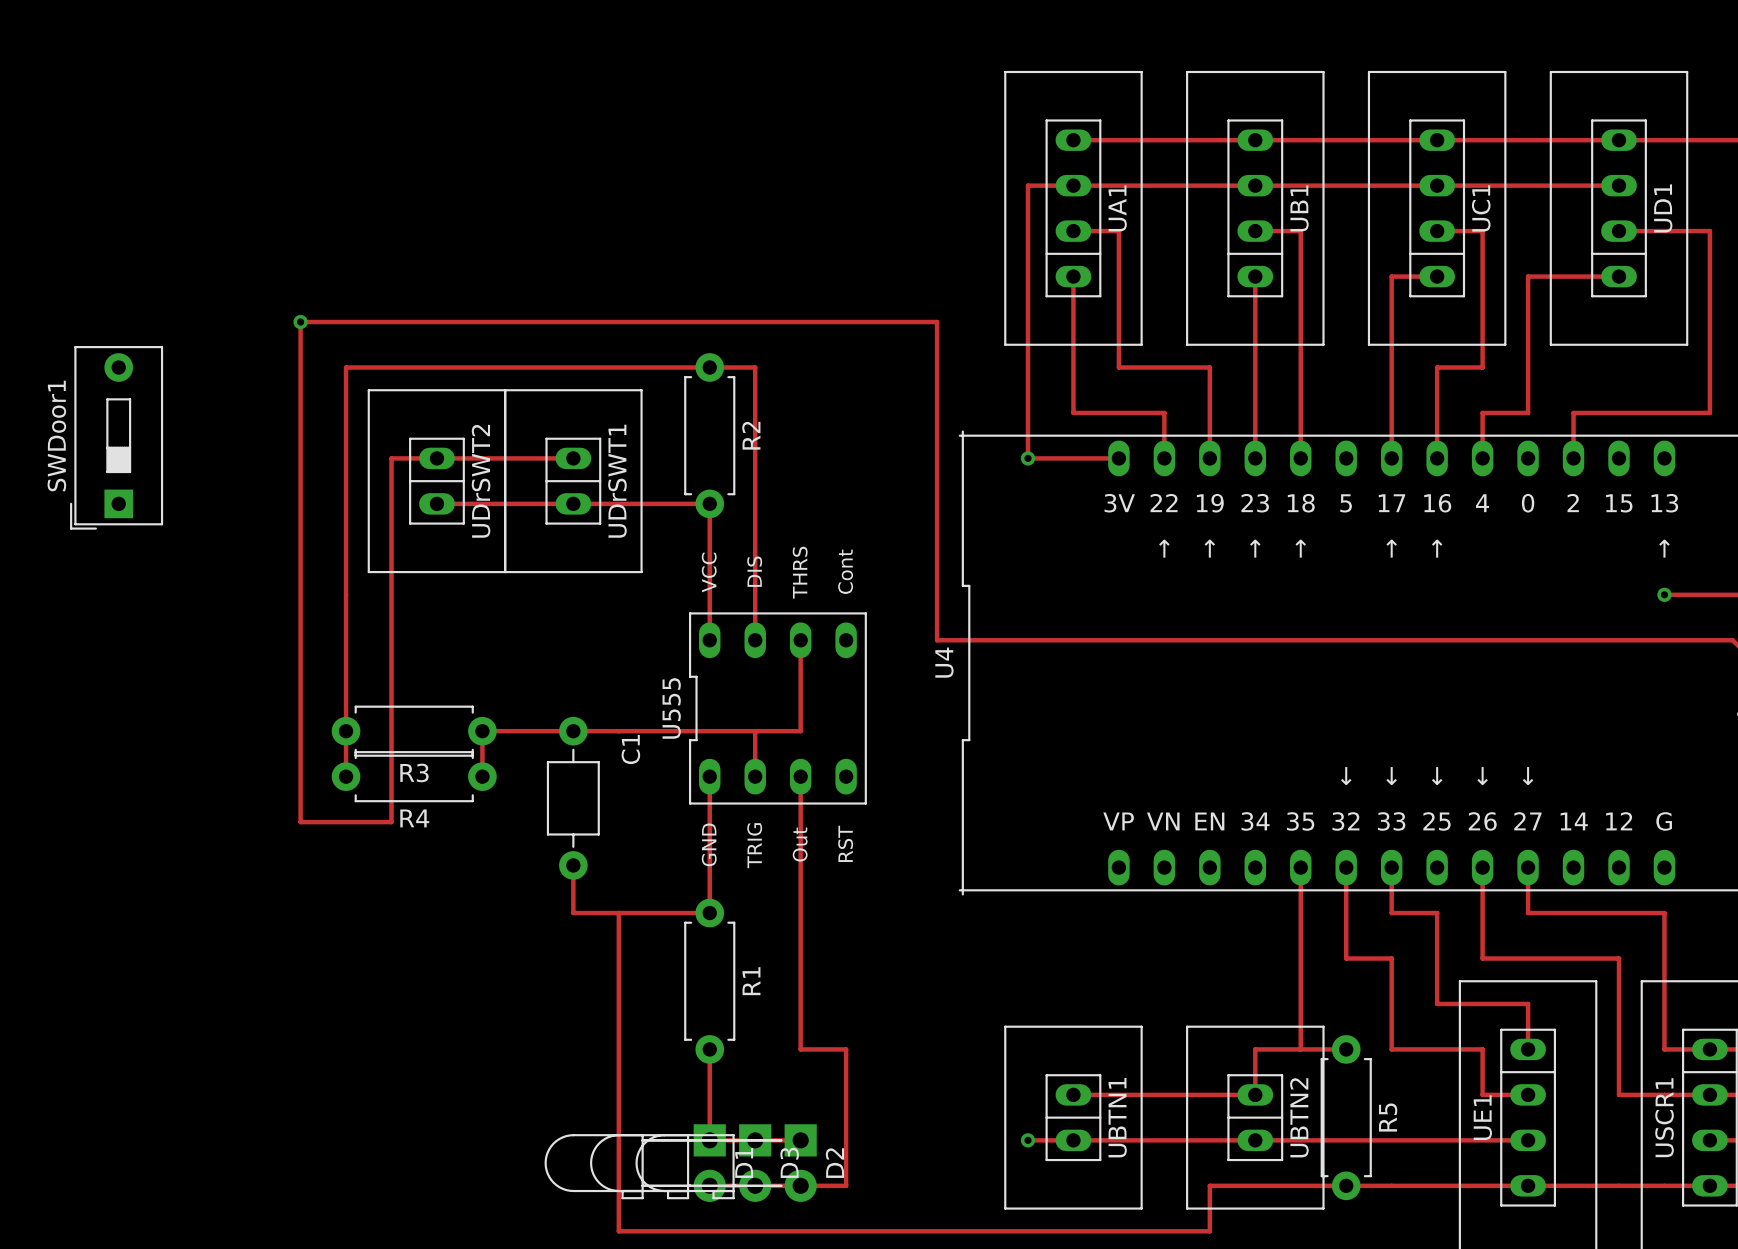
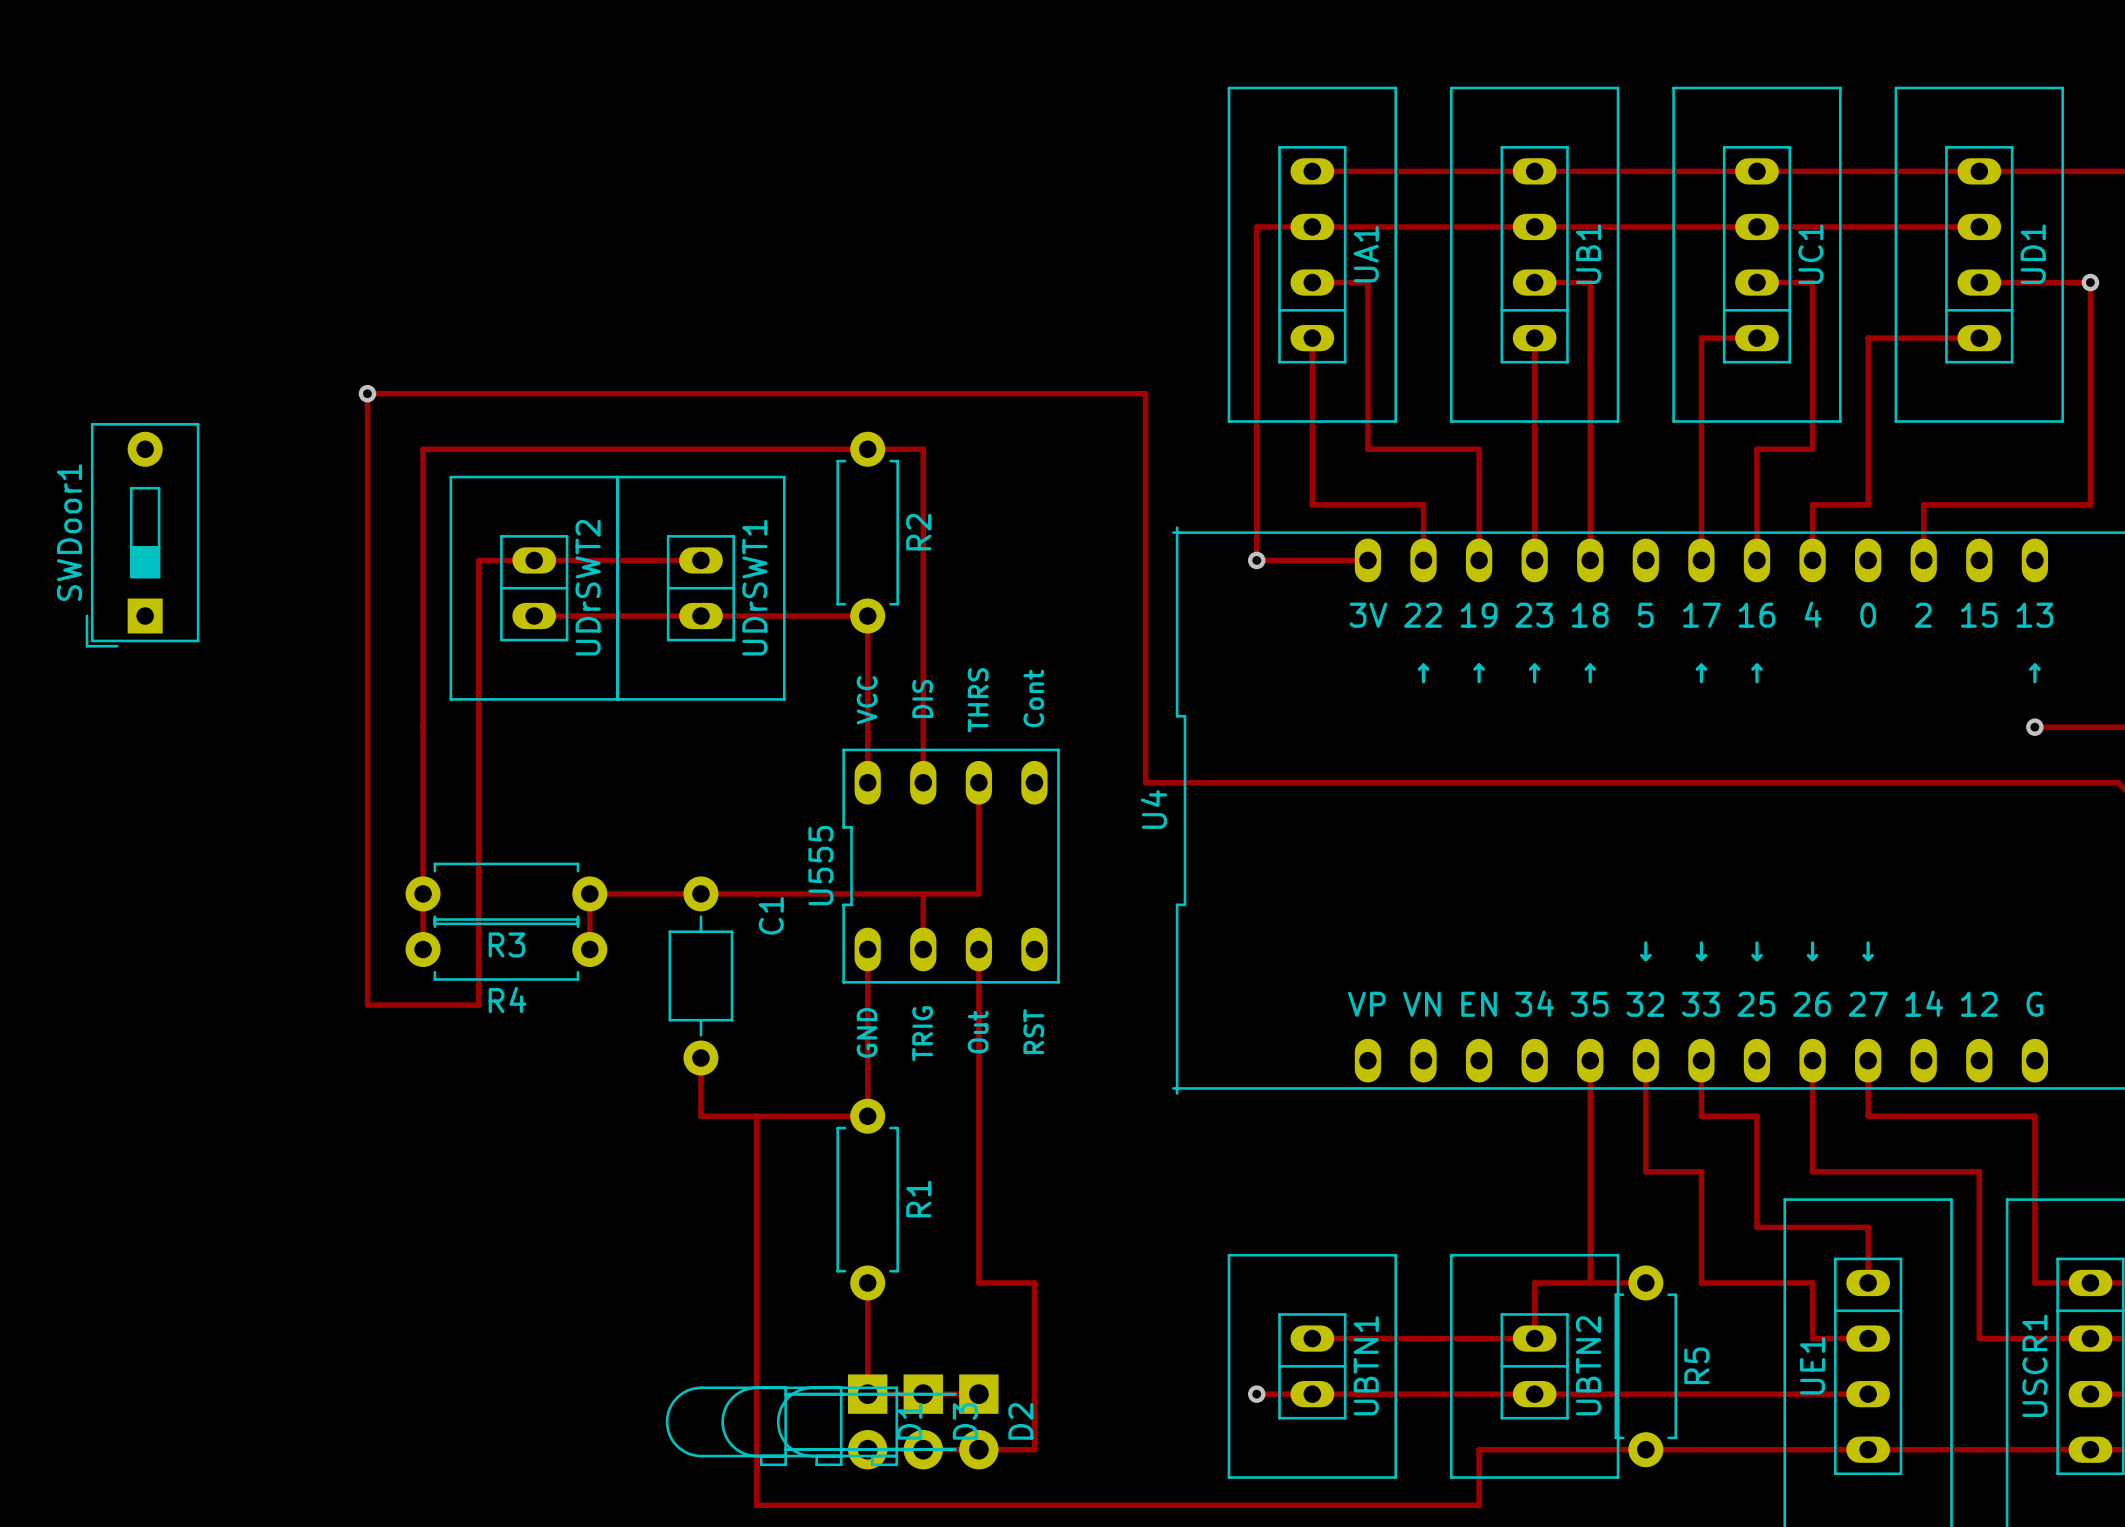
via: none -> (2090, 282)

